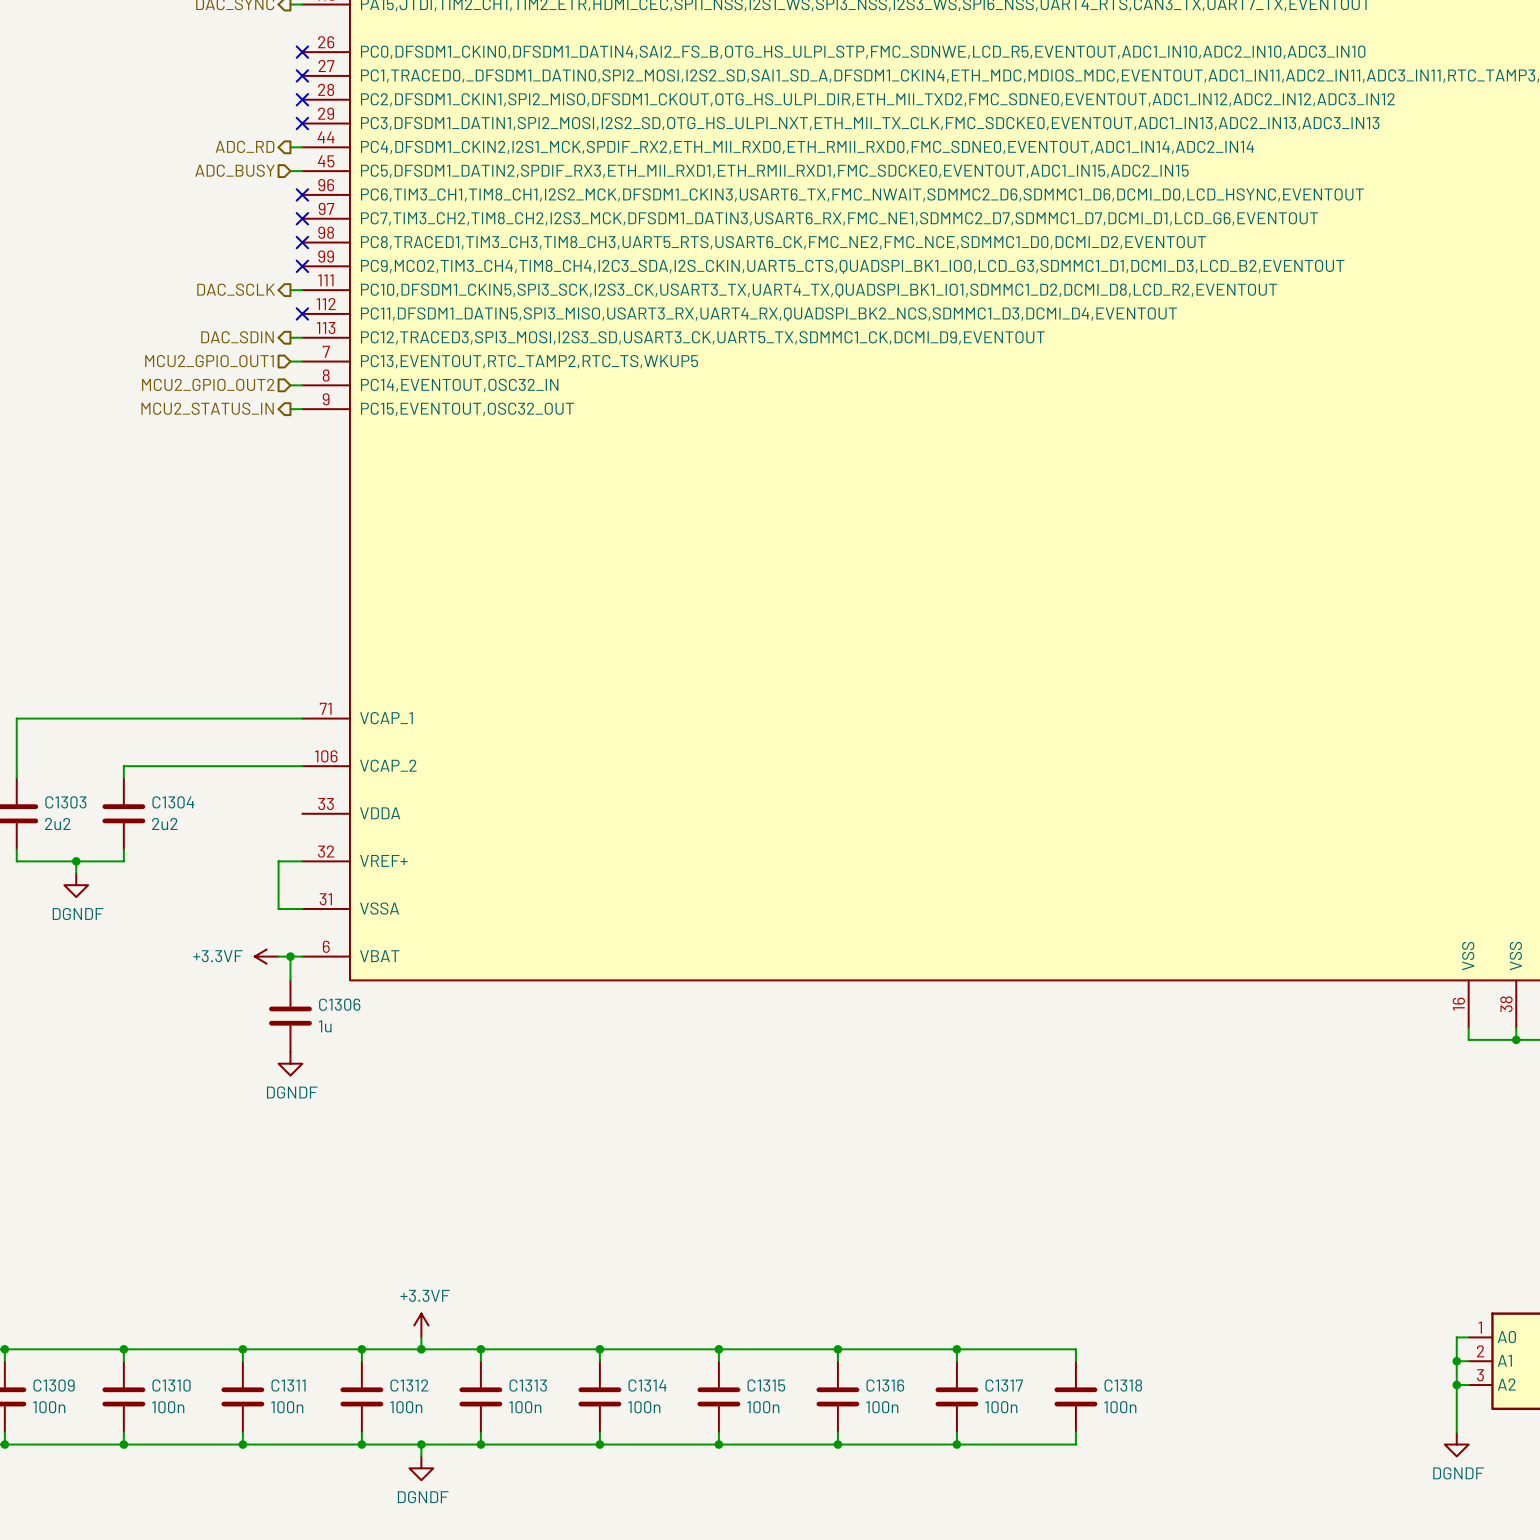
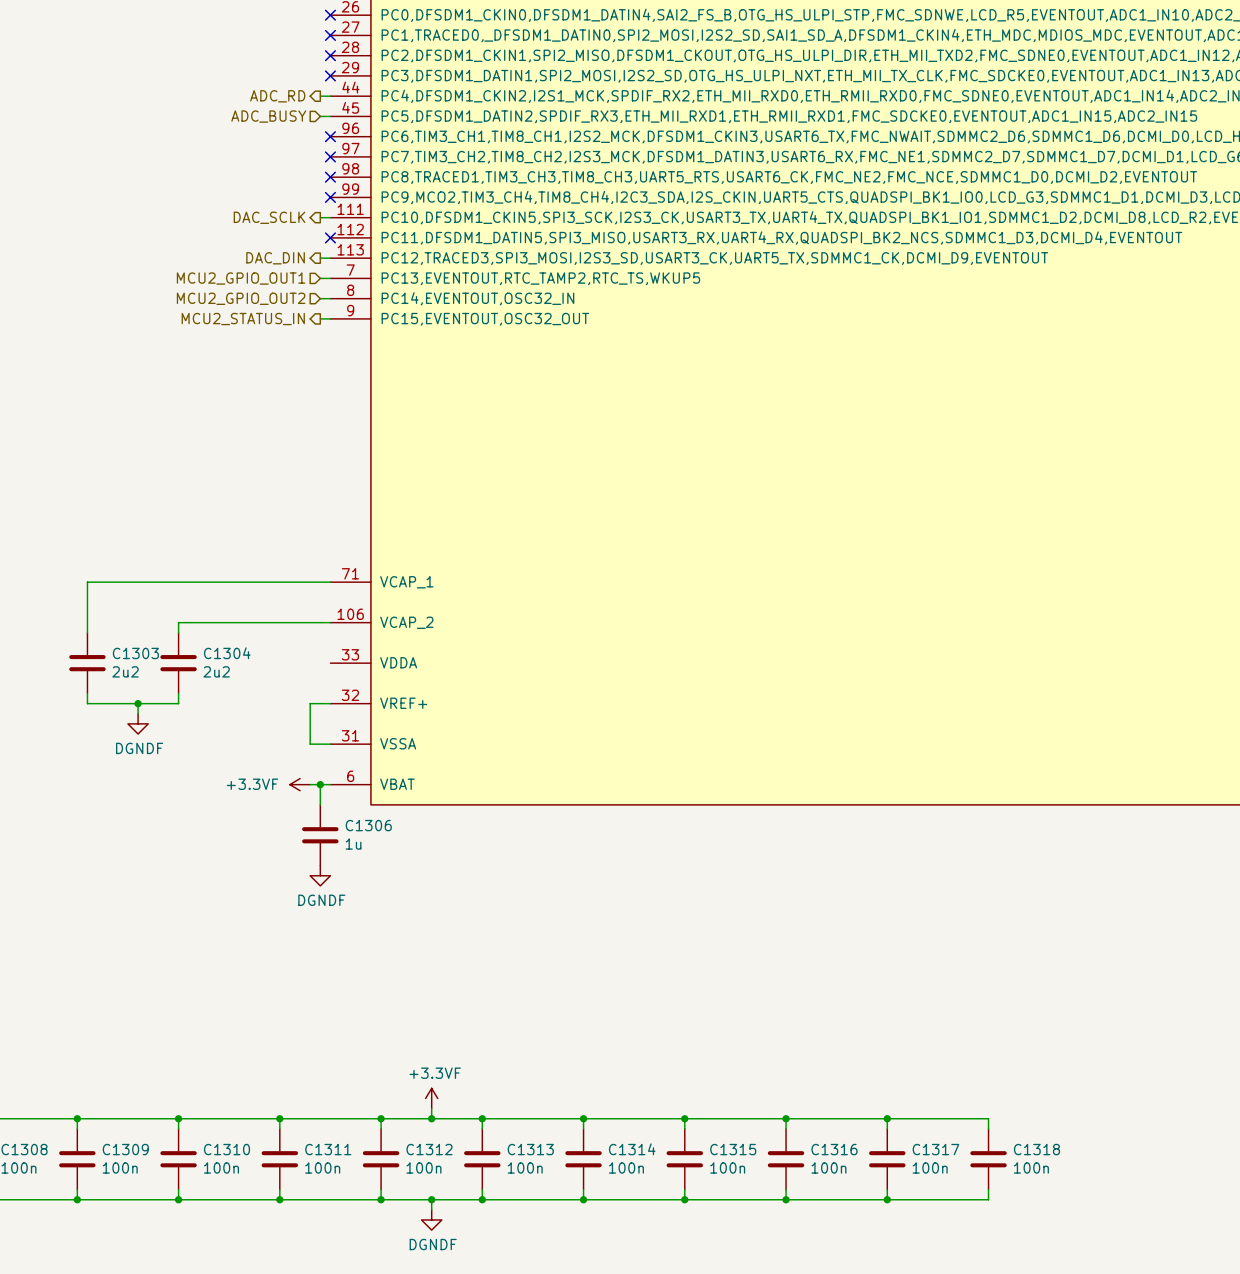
hierarchical label: DAC_SDIN (237, 337) -> DAC_DIN (275, 258)

